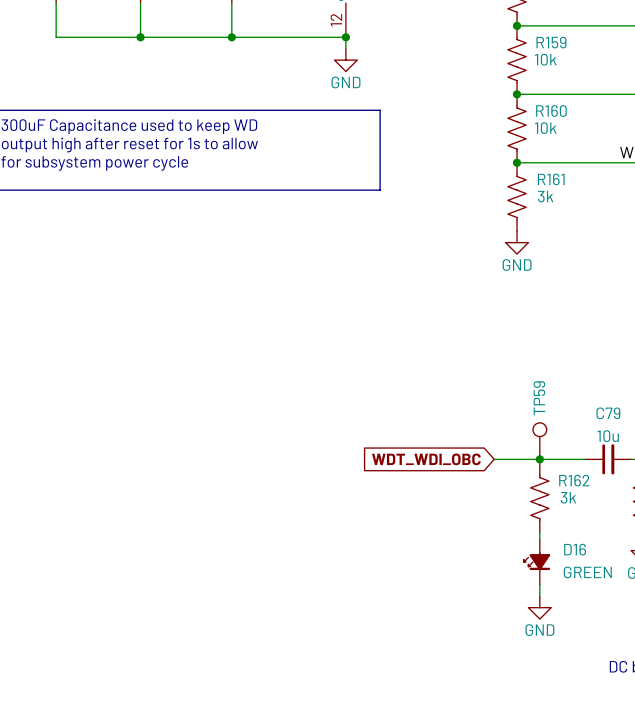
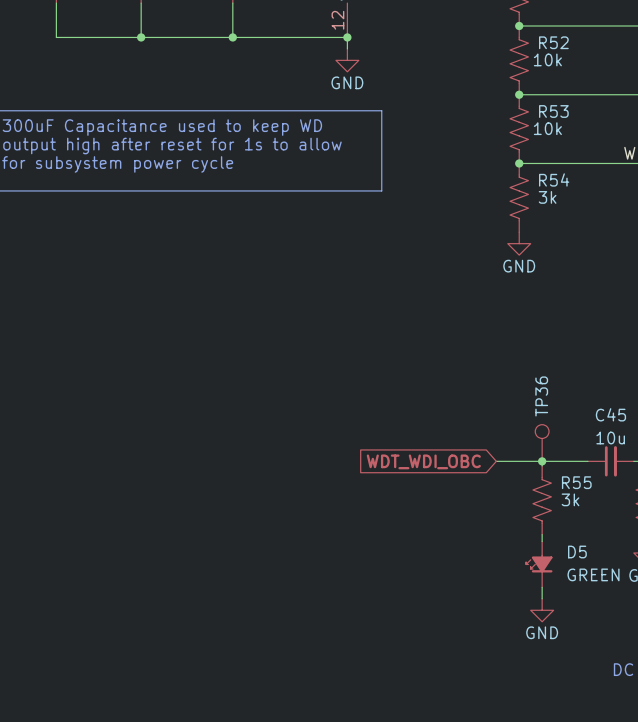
R159 name: R159 (551, 42) -> R52 (553, 42)
R160 name: R160 (551, 111) -> R53 (553, 111)
R161 name: R161 (551, 179) -> R54 (554, 179)
TP59 name: TP59 (539, 398) -> TP36 (541, 396)
C79 name: C79 (608, 413) -> C45 (610, 414)
R162 name: R162 (574, 480) -> R55 (576, 482)
D16 name: D16 (575, 549) -> D5 (577, 552)

